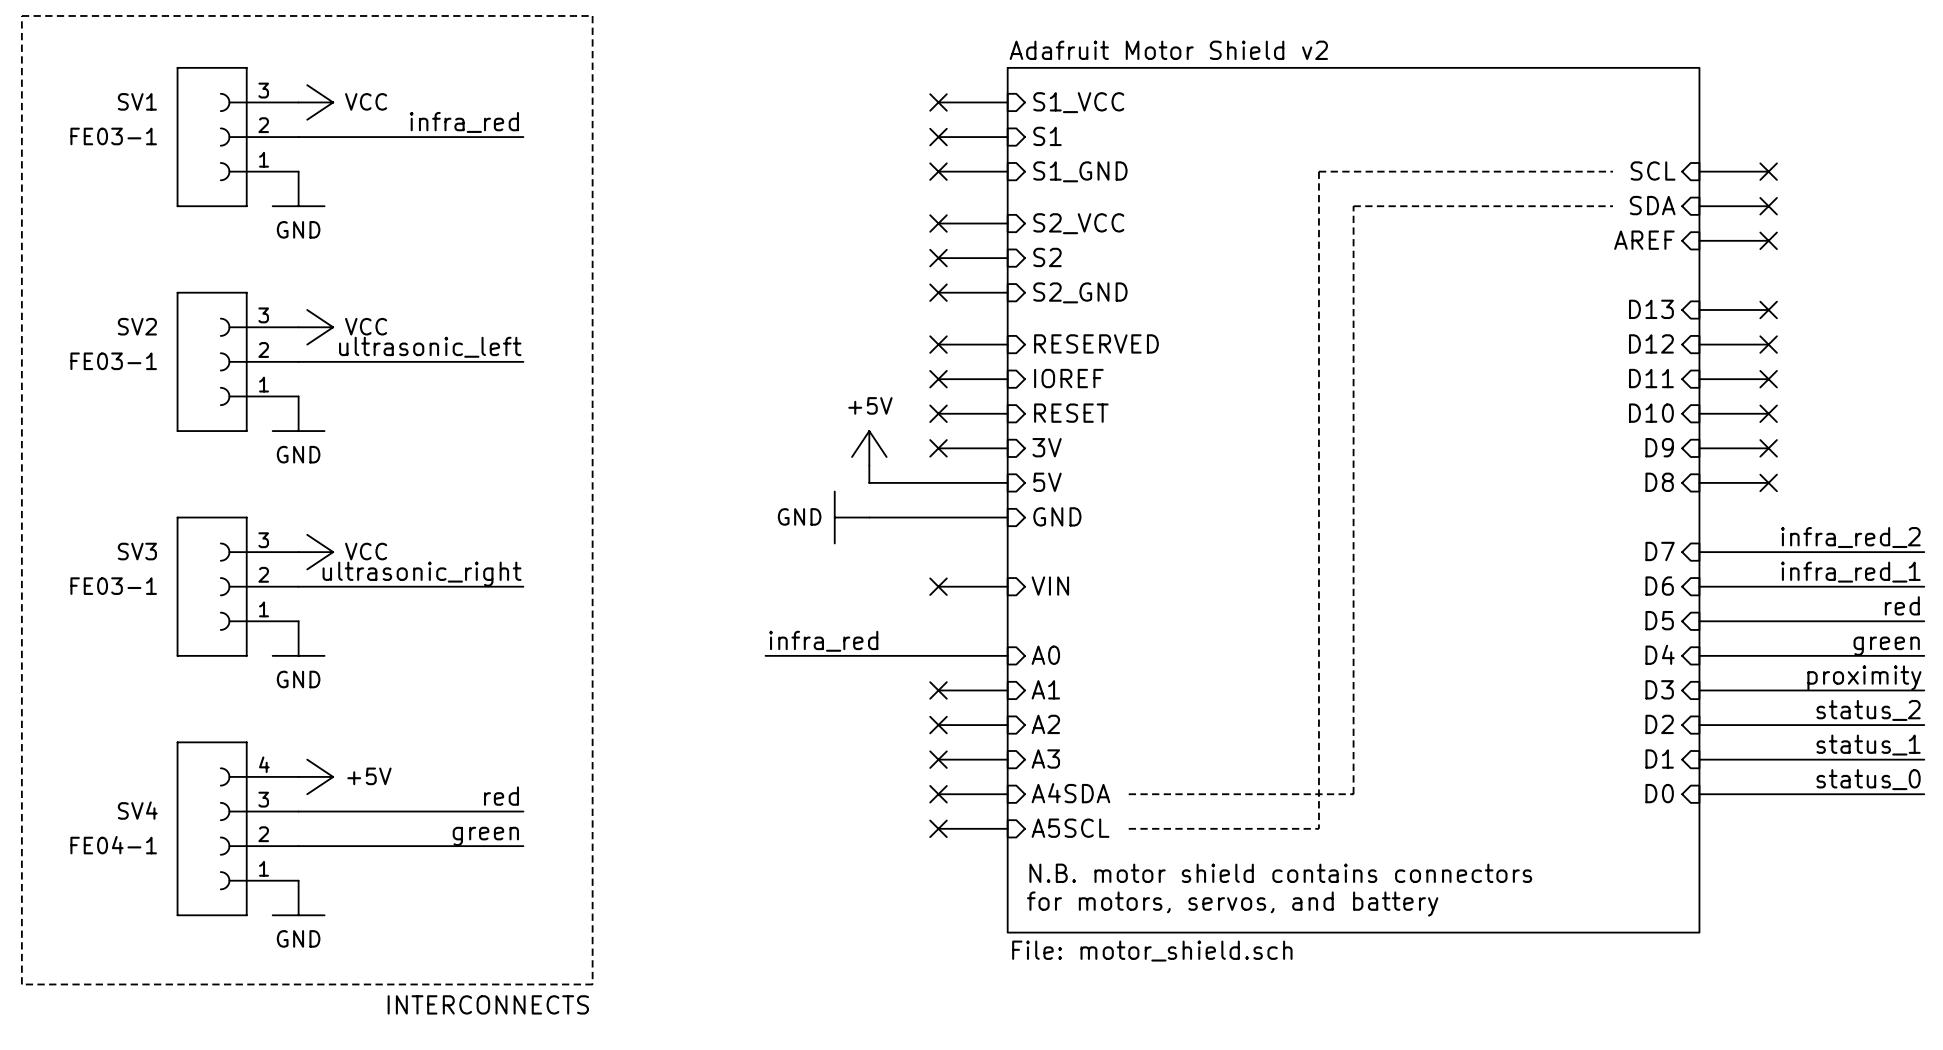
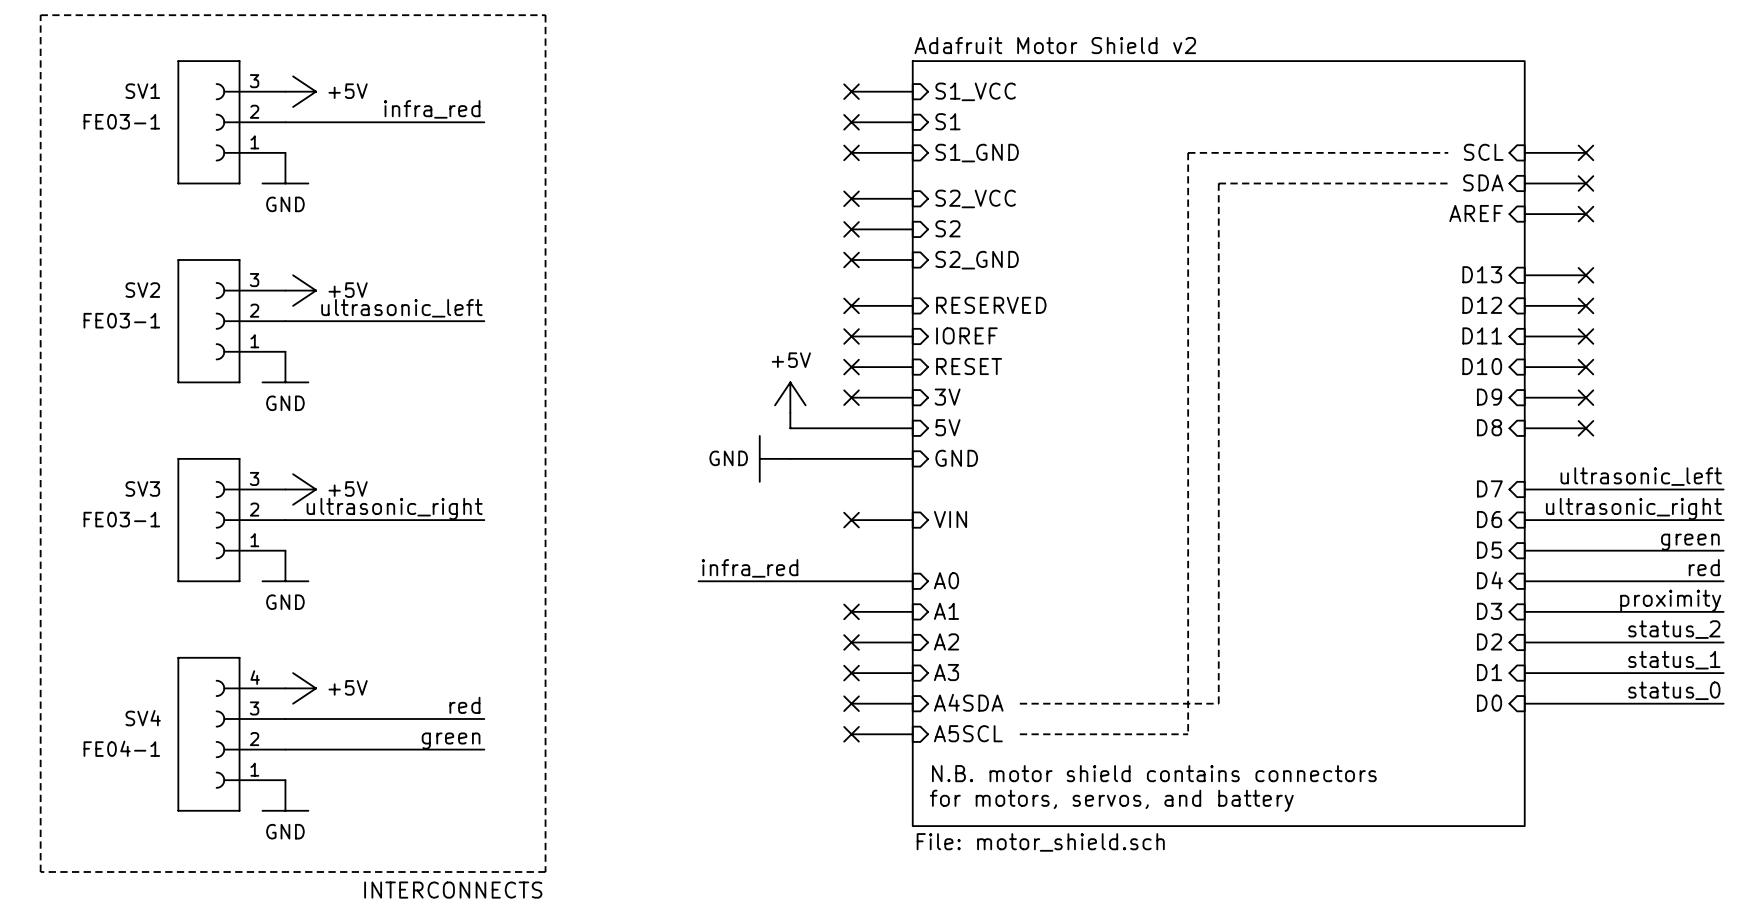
power symbol: VCC (315, 102) -> +5V (300, 91)
power symbol: VCC (315, 327) -> +5V (300, 290)
label: infra_red_2 (1850, 537) -> ultrasonic_left (1641, 476)
power symbol: VCC (315, 552) -> +5V (300, 489)
label: infra_red_1 (1850, 572) -> ultrasonic_right (1633, 508)
label: red (1902, 605) -> green (1690, 542)
label: green (1886, 646) -> red (1704, 567)

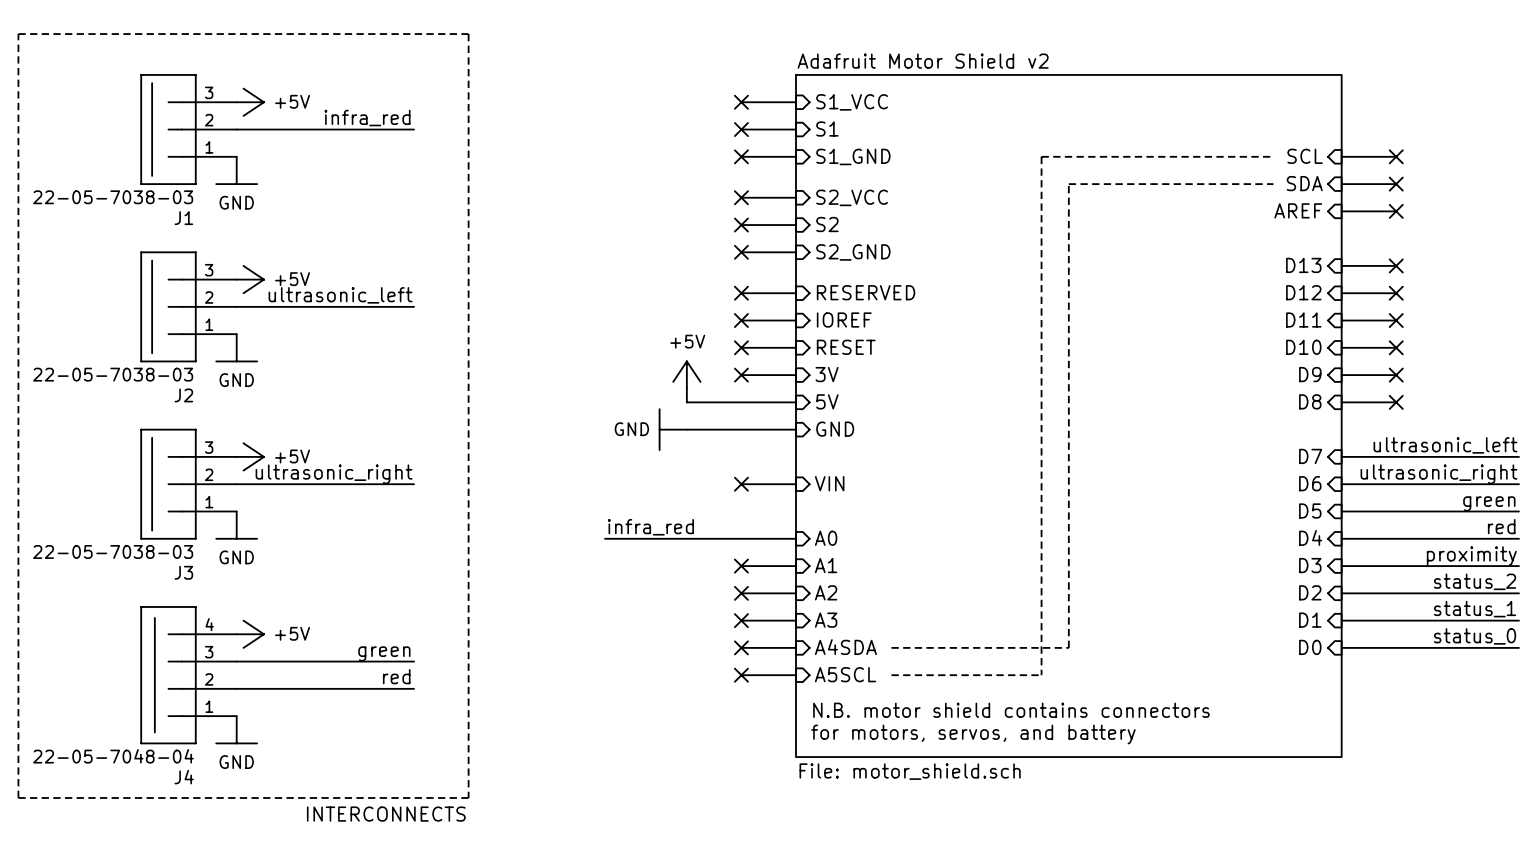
SV1: FE03-1 (231, 122) -> none
J1: none -> 22-05-7038-03 (188, 129)
SV2: FE03-1 (231, 321) -> none
J2: none -> 22-05-7038-03 (188, 306)
SV3: FE03-1 (231, 520) -> none
J3: none -> 22-05-7038-03 (188, 484)
label: red (464, 705) -> green (384, 653)
SV4: FE04-1 (231, 734) -> none
J4: none -> 22-05-7048-04 (188, 675)
label: green (451, 741) -> red (396, 676)

